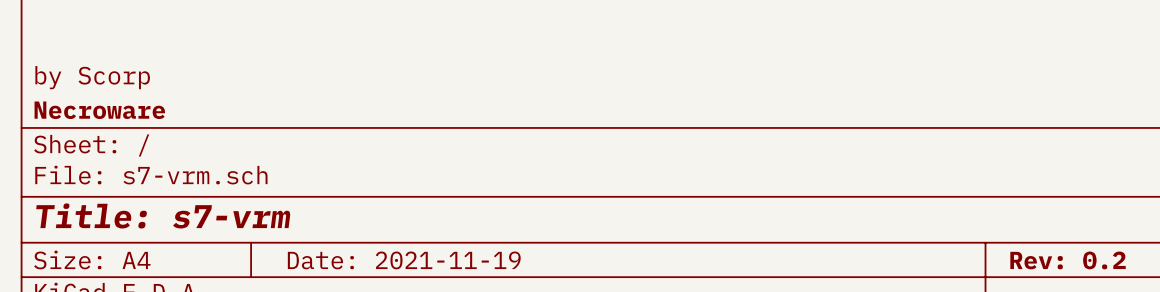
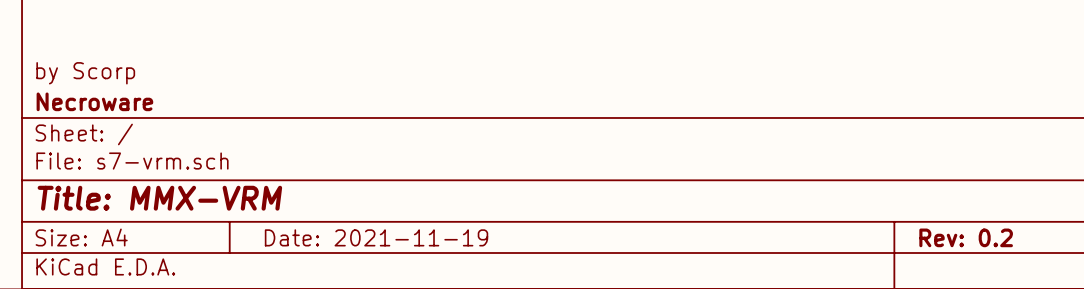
title block: Title: s7-vrm (163, 215) -> Title: MMX-VRM (159, 198)

